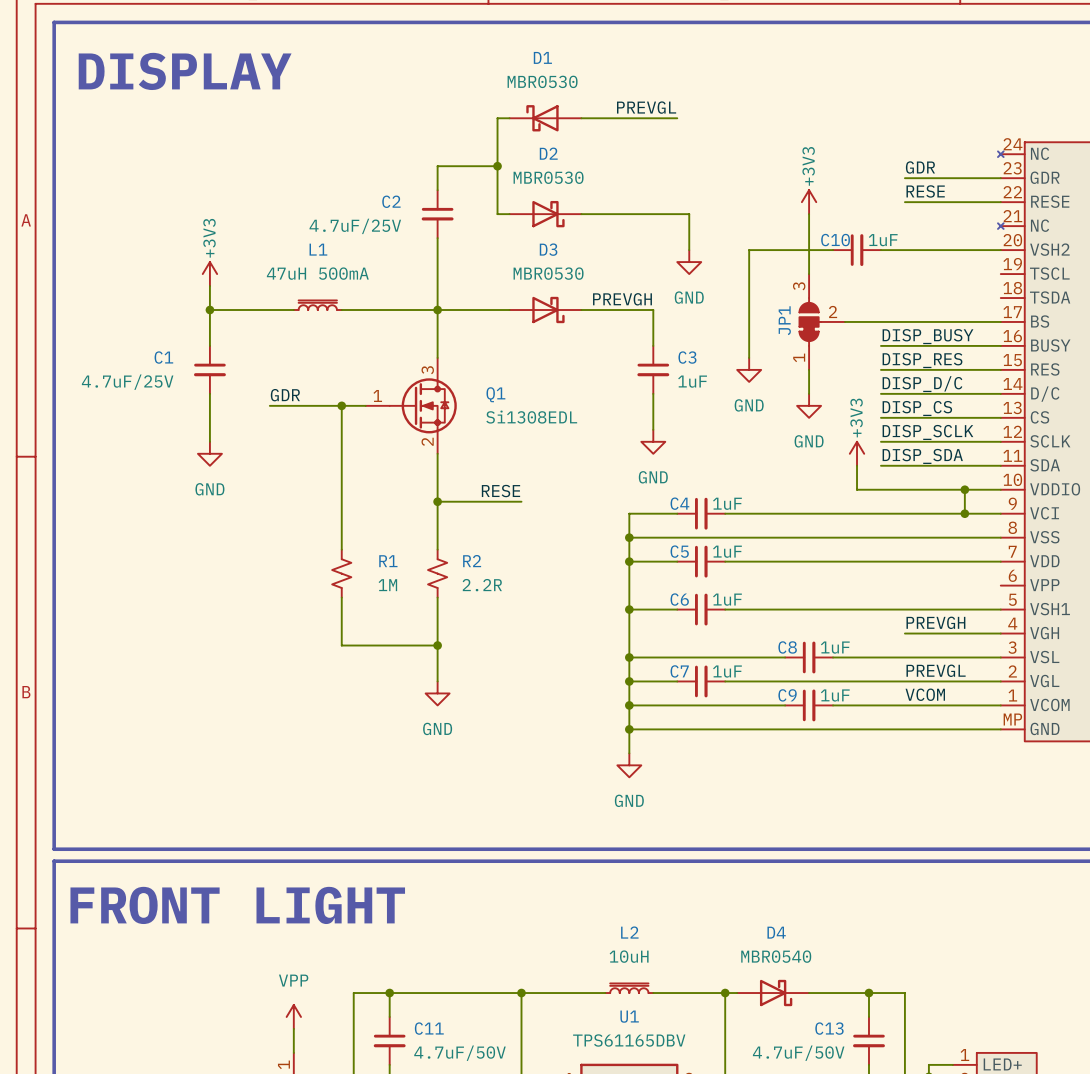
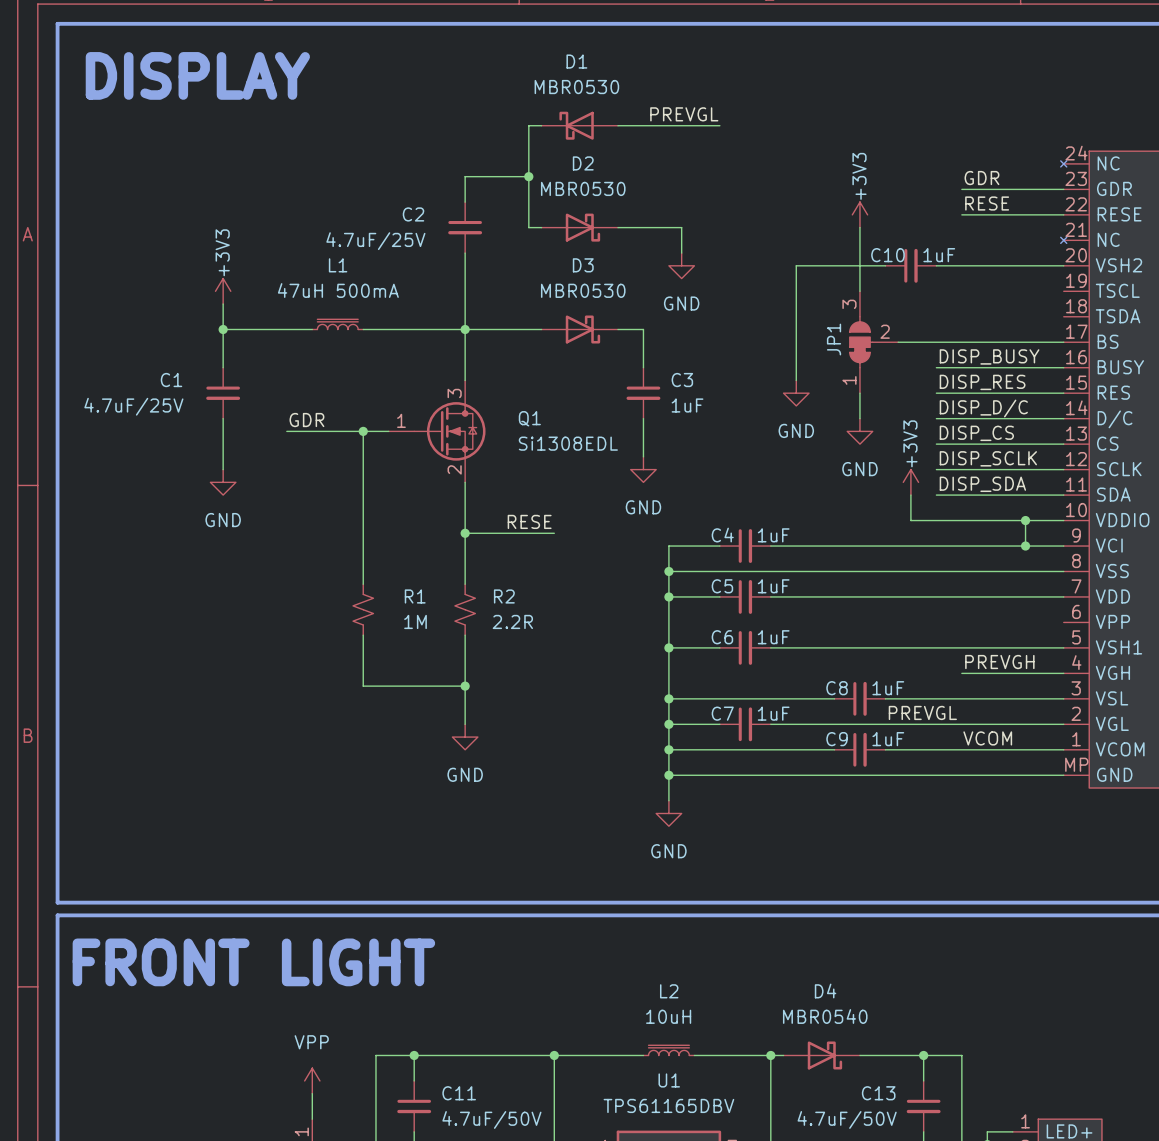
wire: (641, 214) (689, 214) (689, 250) -> (681, 227) (681, 253)
power symbol position: GND (689, 262) -> GND (681, 265)
label: PREVGH (622, 299) -> none
wire: (605, 310) (653, 310) (653, 345) -> (643, 329) (643, 367)
C3 position: (653, 369) -> (643, 393)
wire: (653, 393) (653, 429) -> (643, 418) (643, 456)
power symbol position: GND (653, 441) -> GND (643, 469)
label position: PREVGL (936, 670) -> PREVGL (922, 712)

